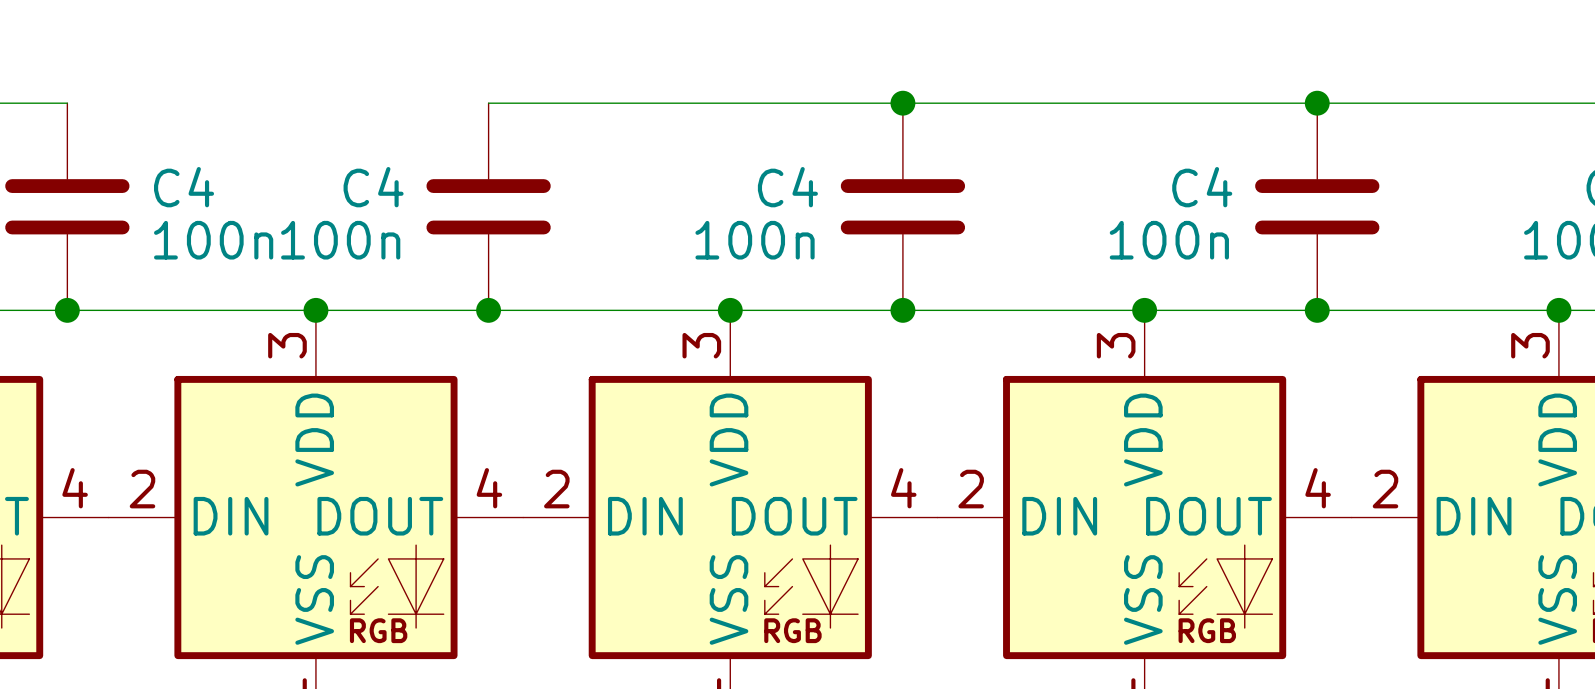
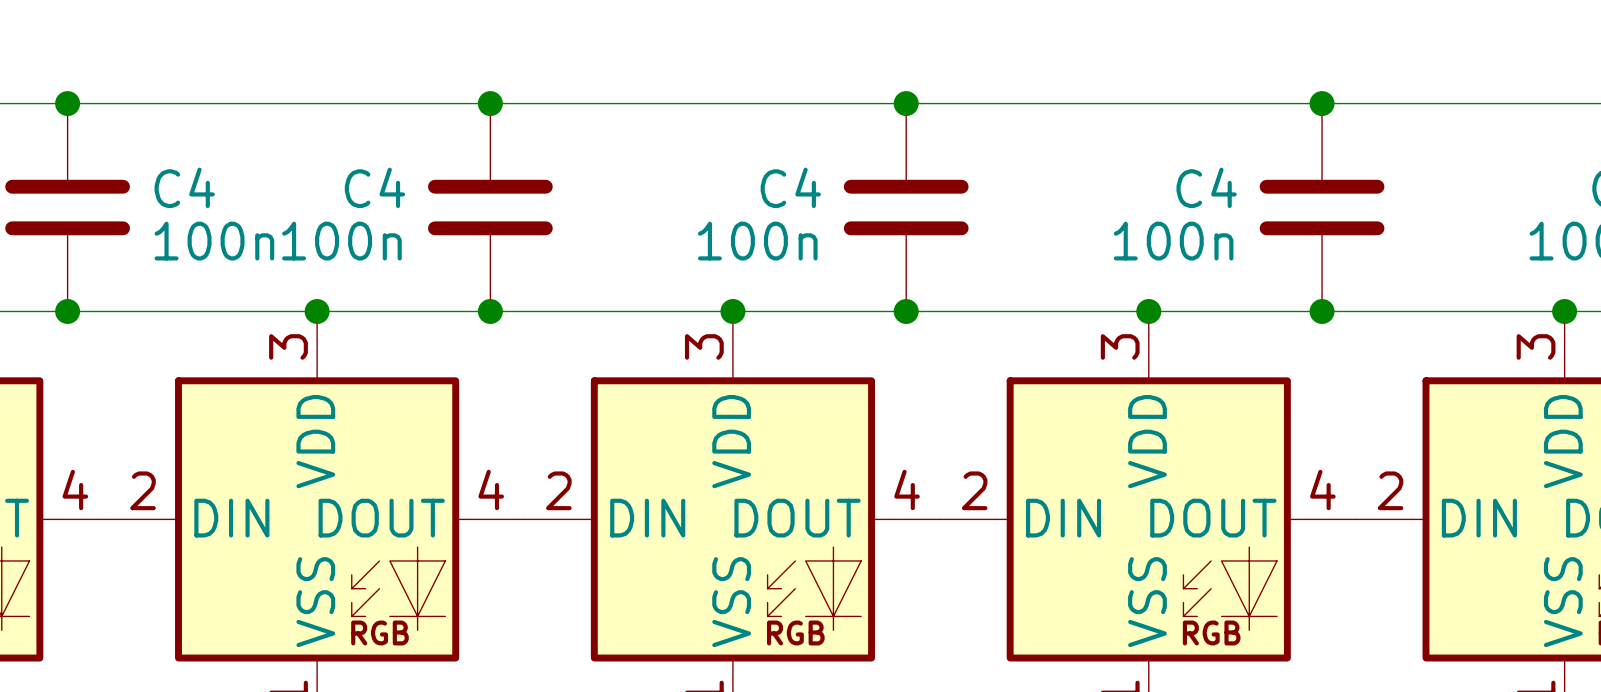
wire: none -> (67, 103) (490, 103)
junction: none -> (67, 103)
junction: none -> (490, 103)

